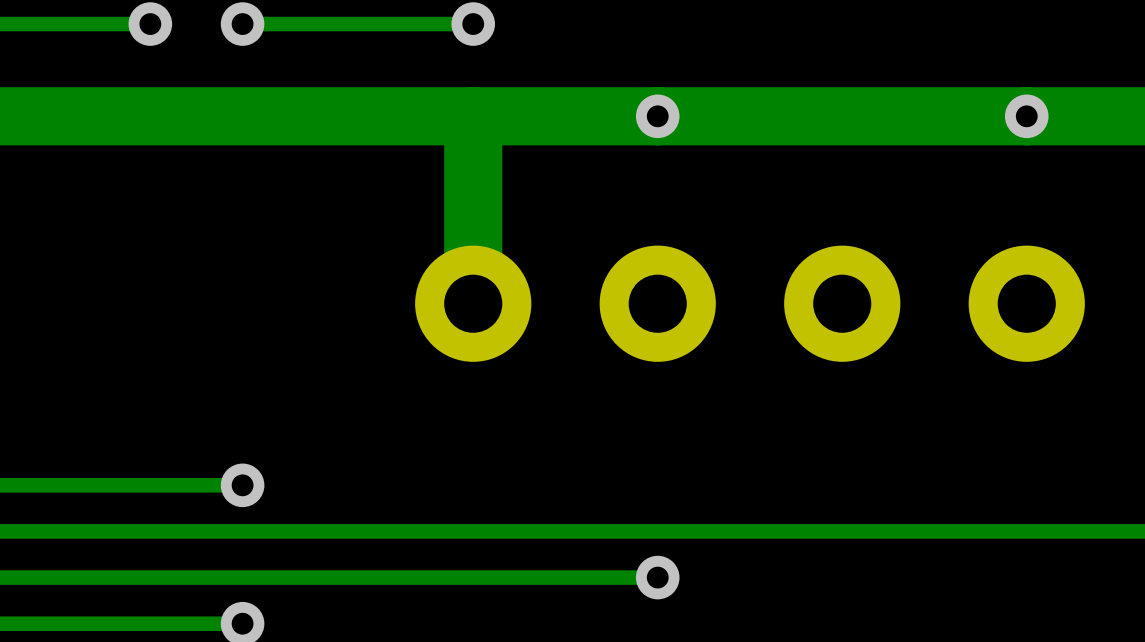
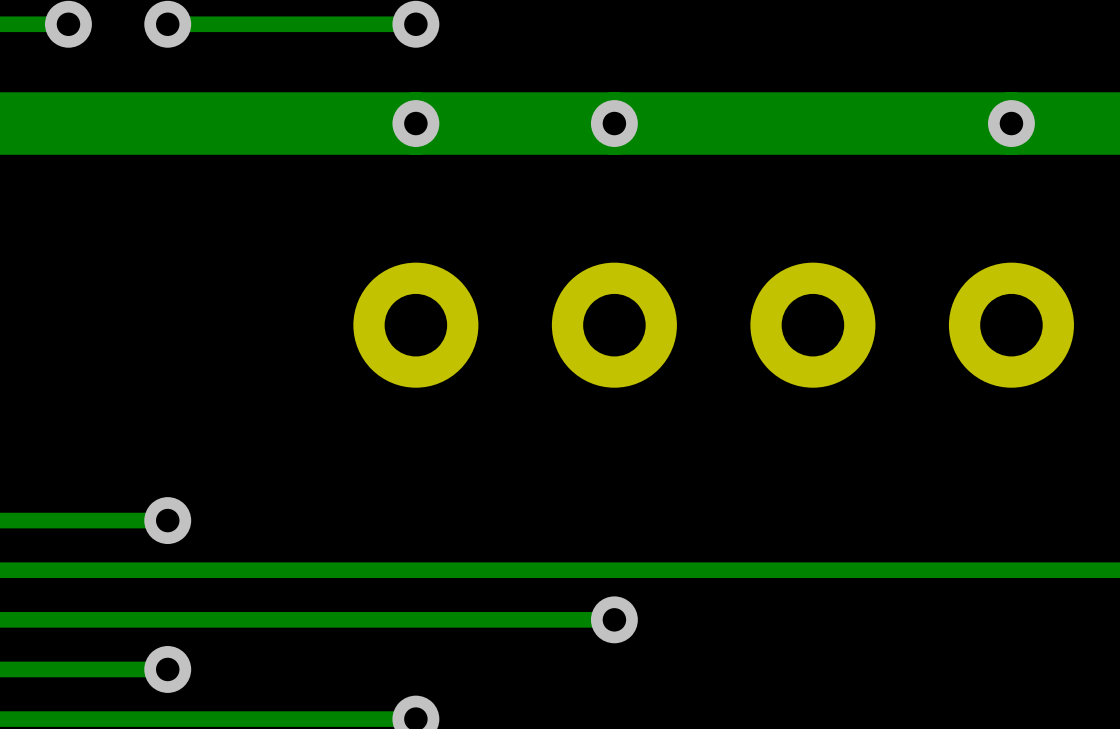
track: (473, 116) (473, 303) -> none
via: none -> (415, 123)

